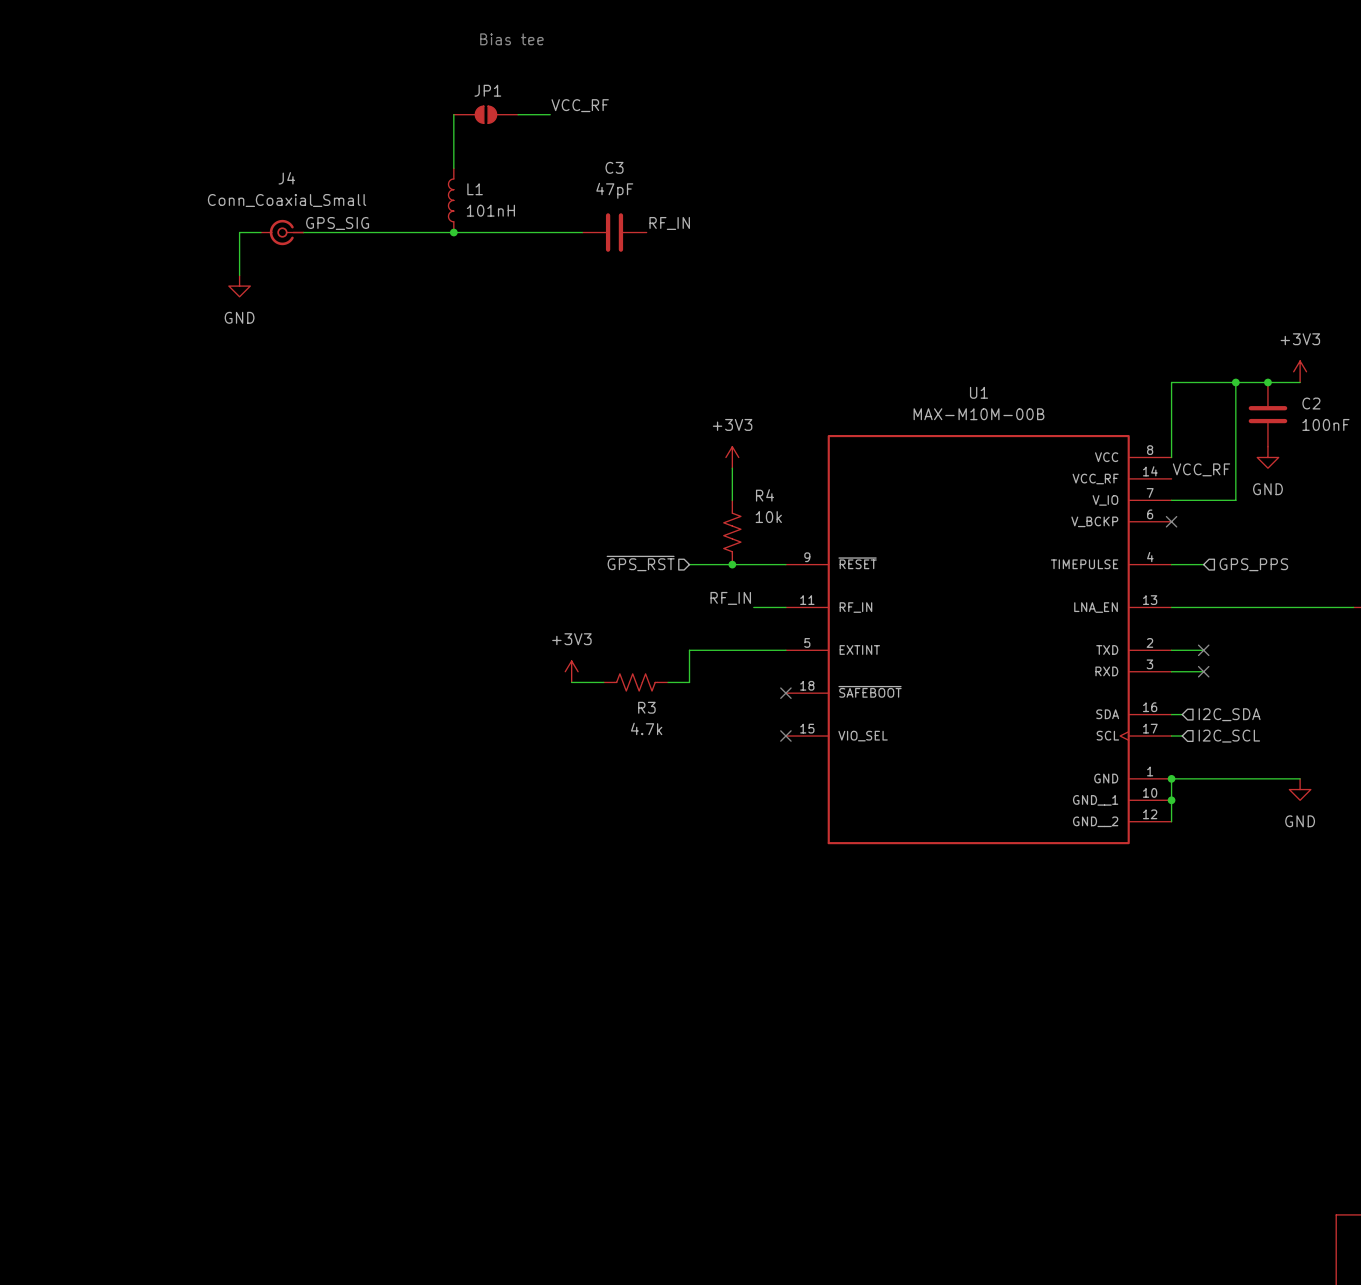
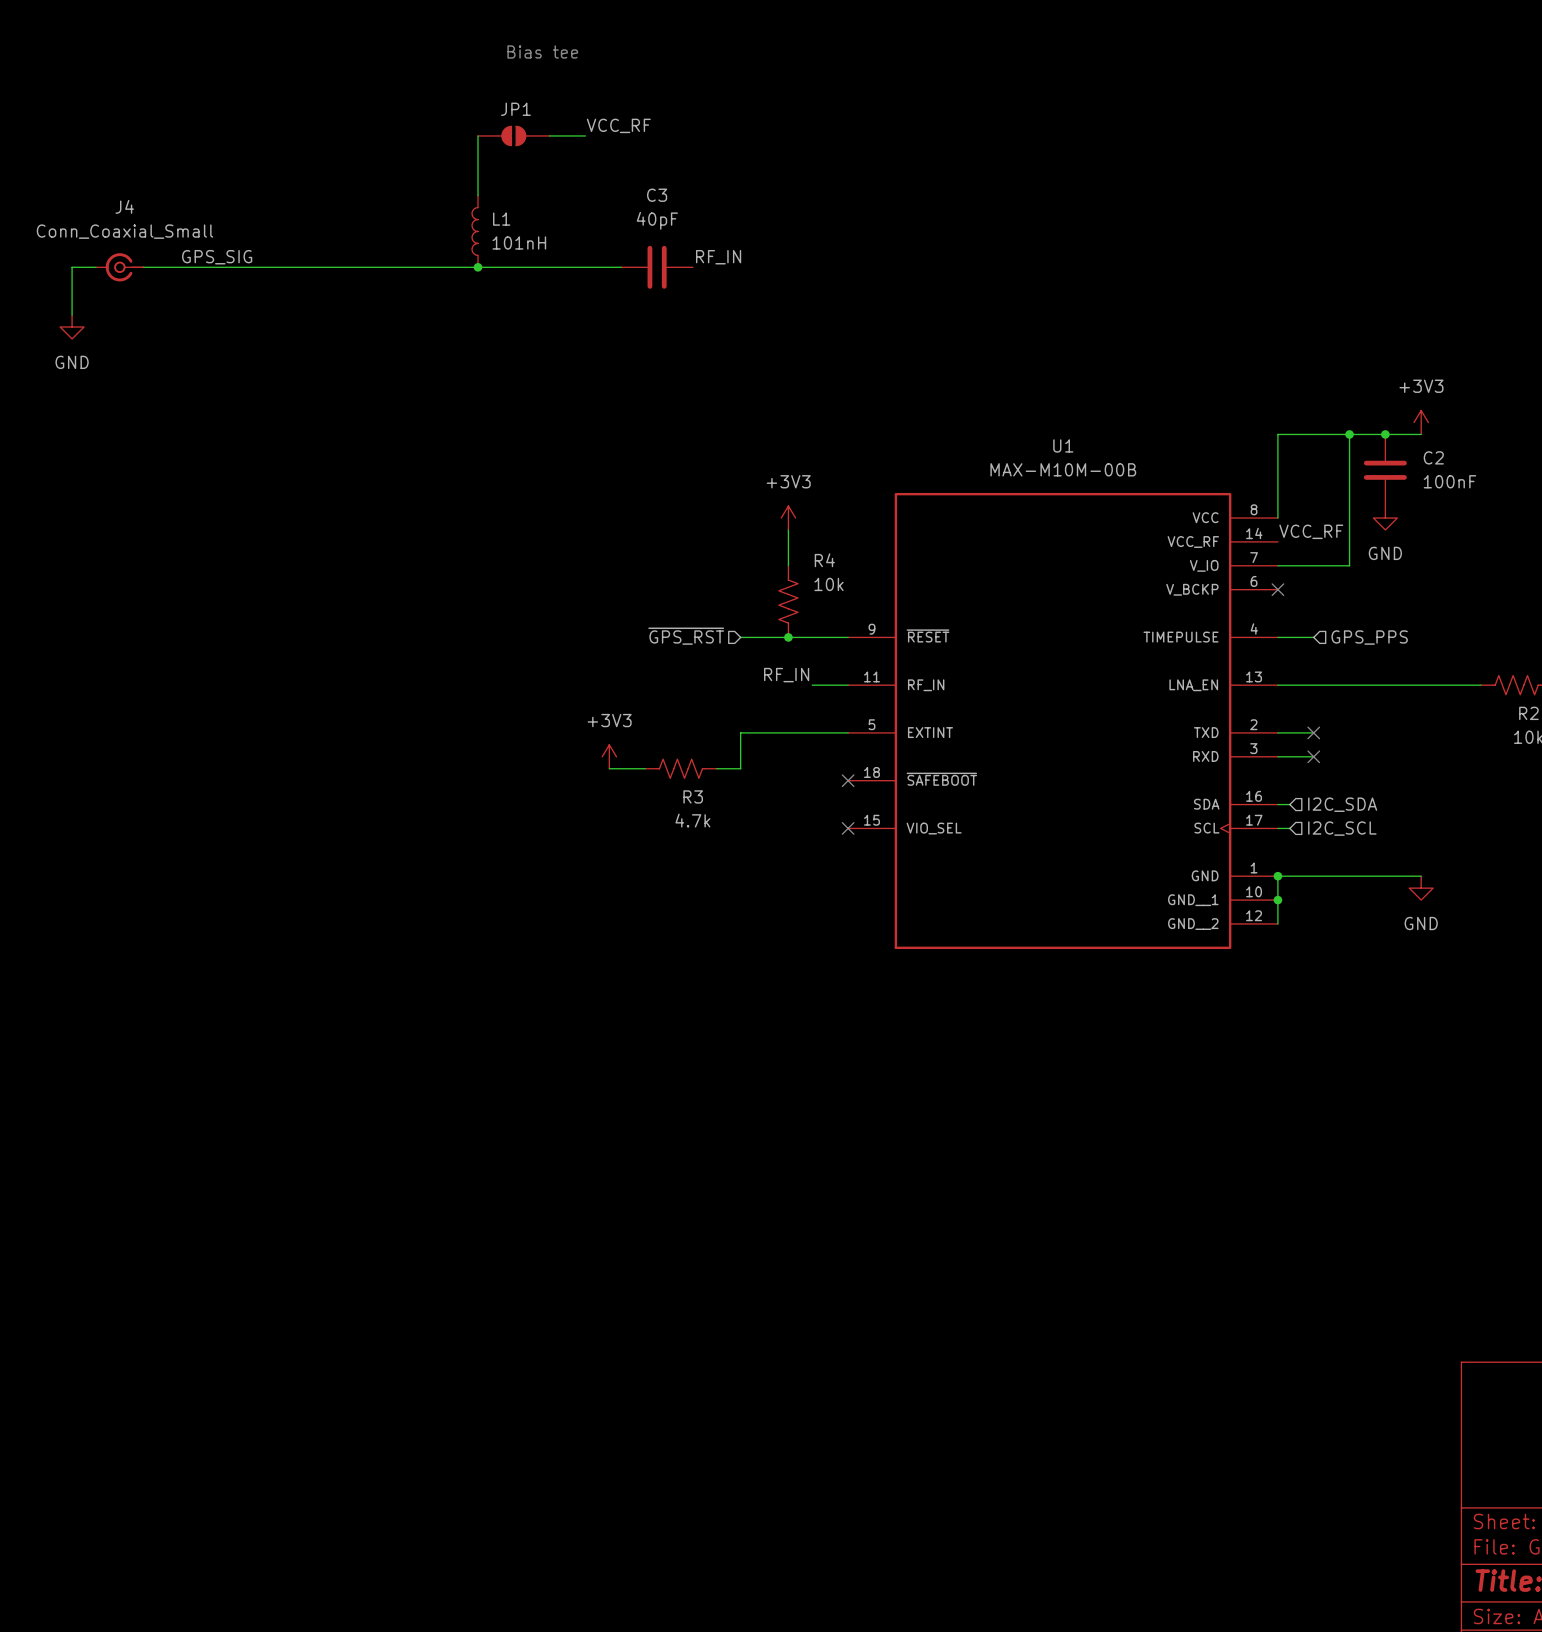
C3 value: 47pF (614, 190) -> 40pF (657, 220)
label position: GPS_SIG (337, 223) -> GPS_SIG (217, 257)
wire: none -> (95, 267) (72, 267) (72, 315)
wire: (239, 232) (239, 275) -> (239, 267) (143, 267)
J4 position: (282, 232) -> (119, 267)
power symbol position: GND (239, 286) -> GND (72, 327)

